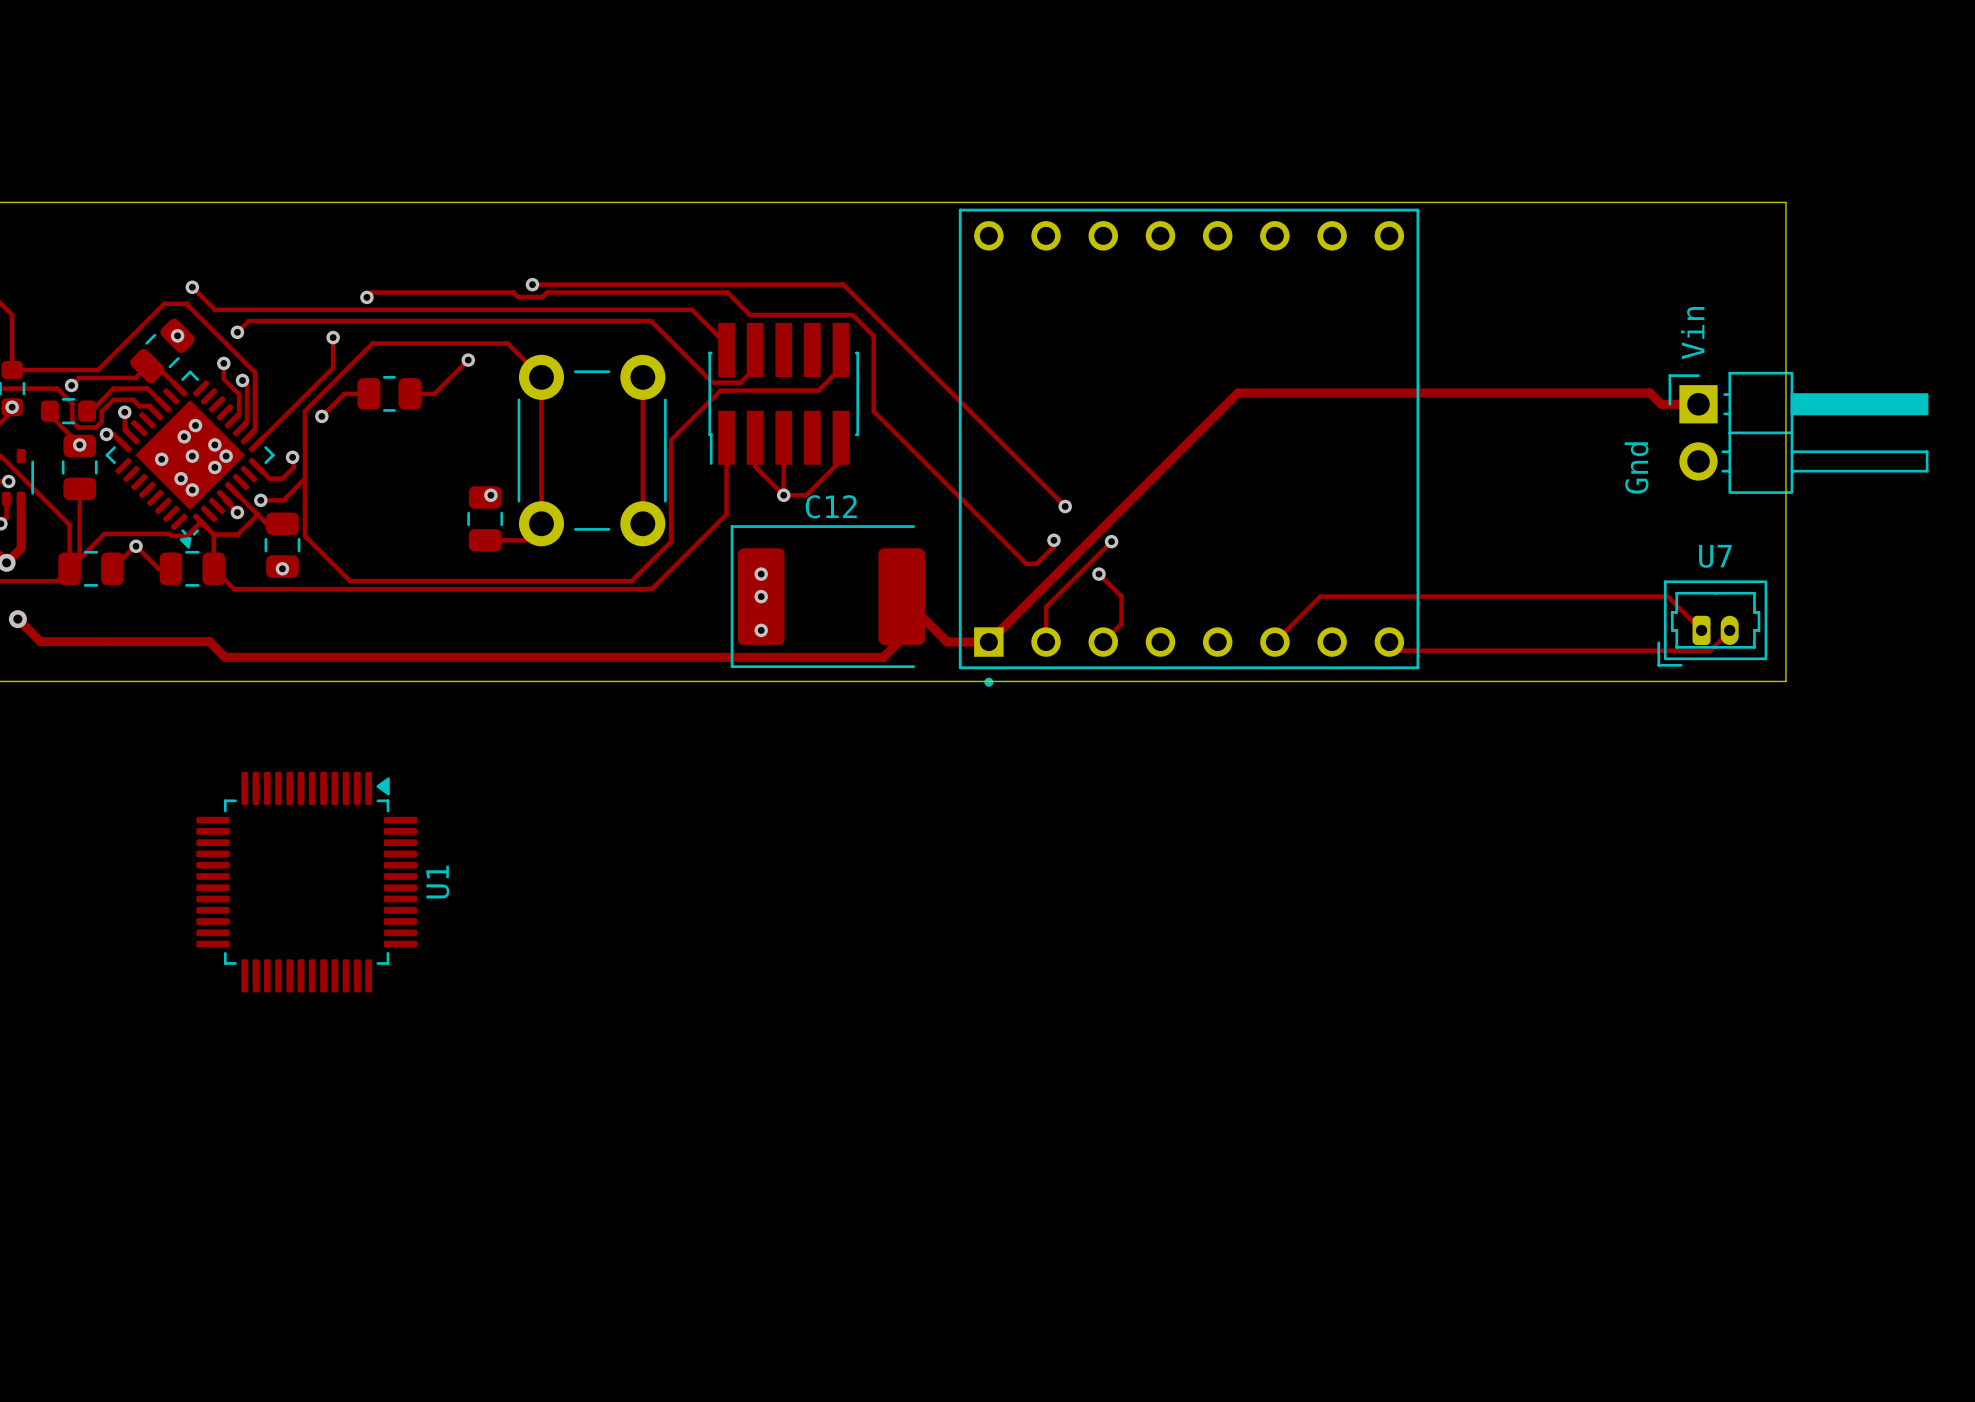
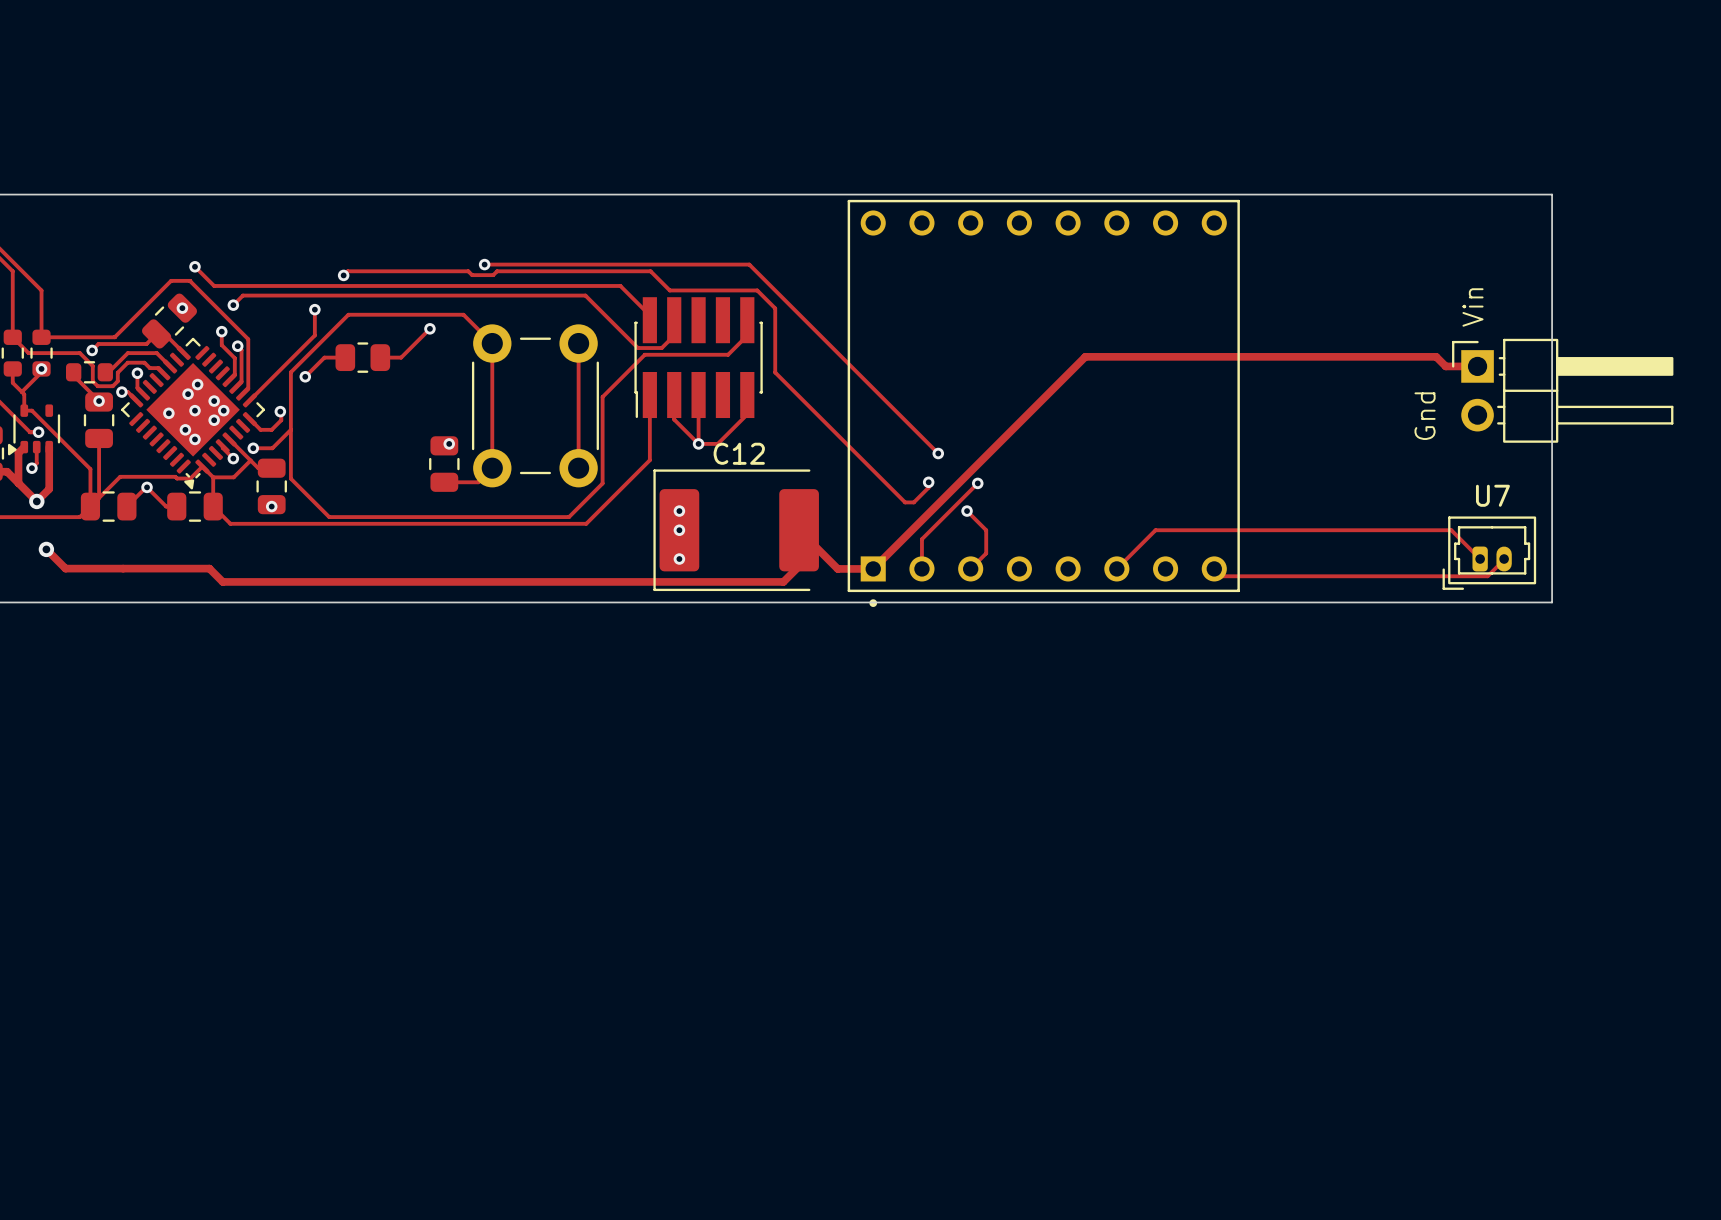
U1: (306, 882) -> none

